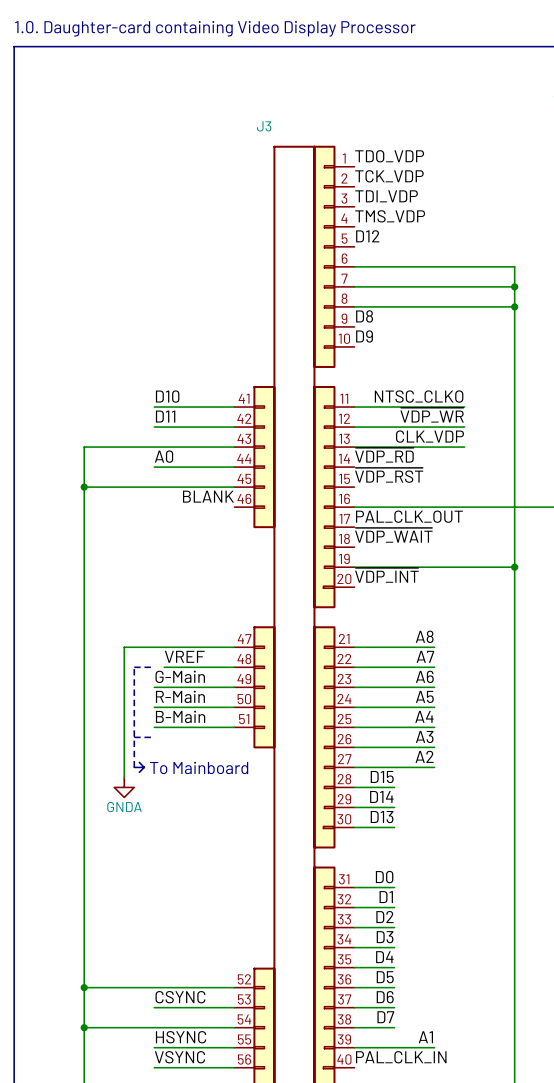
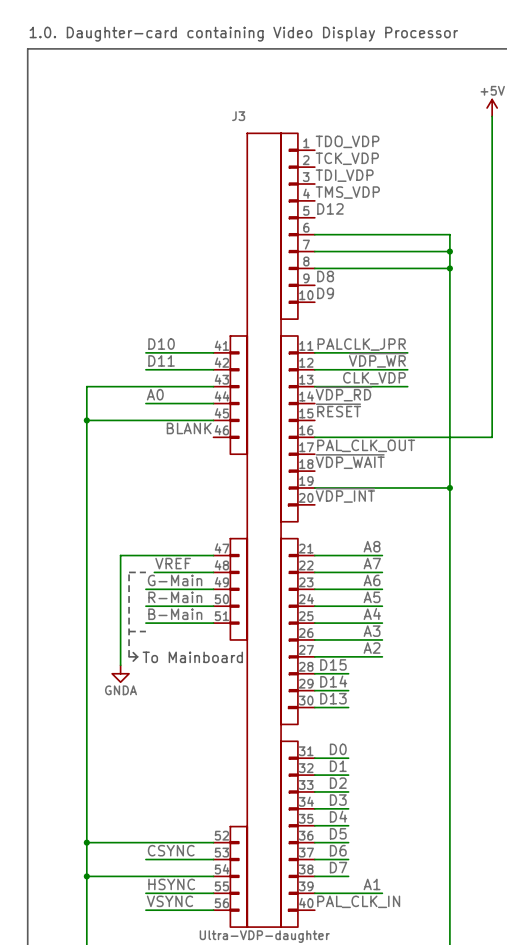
label: NTSC_CLKO (419, 396) -> PALCLK_JPR (361, 344)
label: ~{VDP_RST} (389, 475) -> ~{RESET} (338, 410)

